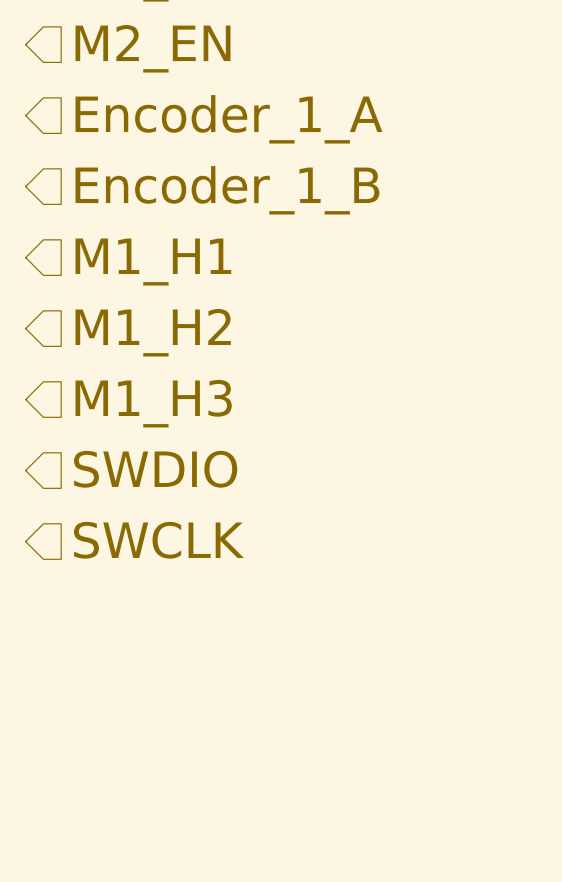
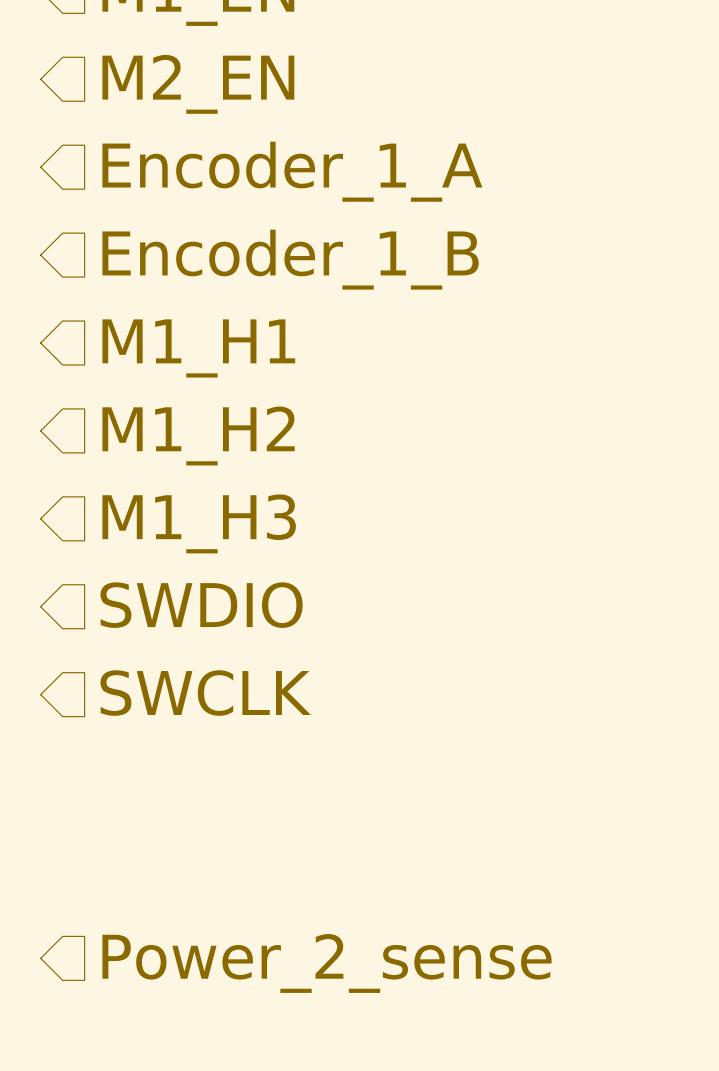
hierarchical label: none -> Power_2_sense (327, 963)

